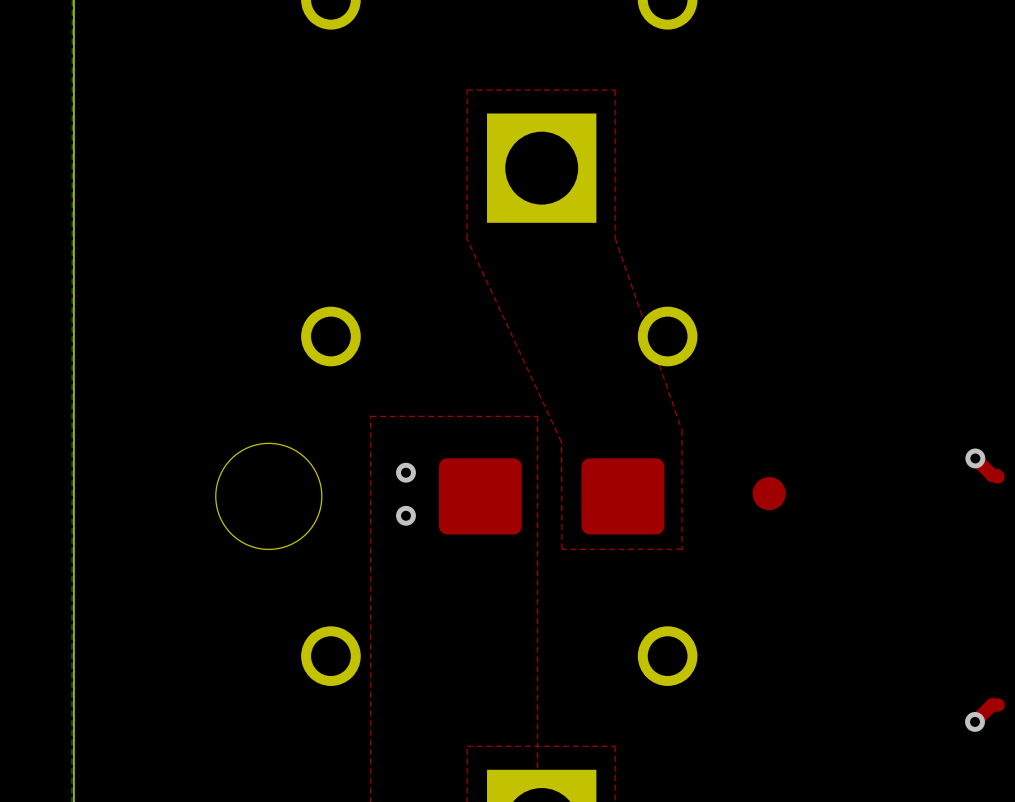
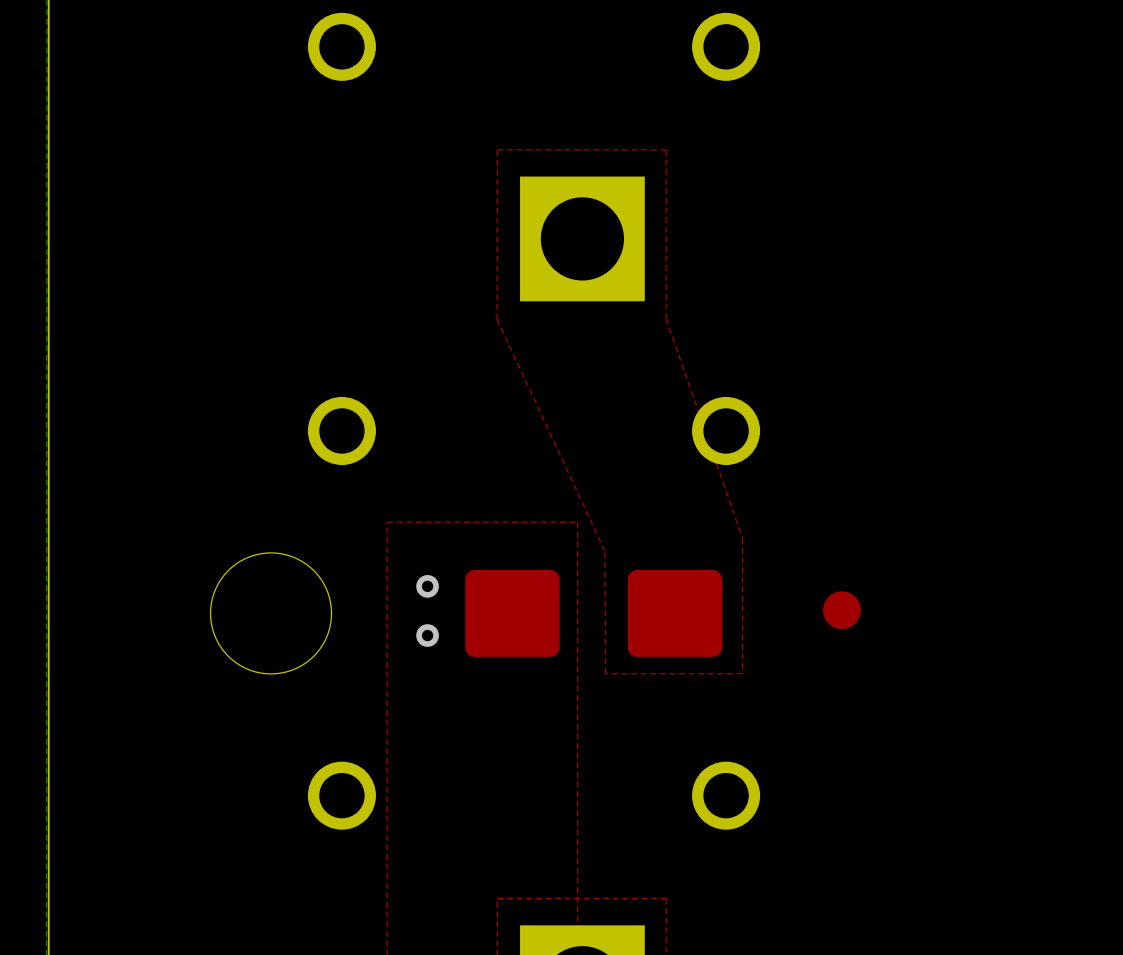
top track: (975, 458) (992, 475) (998, 477) -> none
via: (975, 458) -> none
top track: (998, 705) (991, 705) (975, 721) -> none
via: (975, 721) -> none

